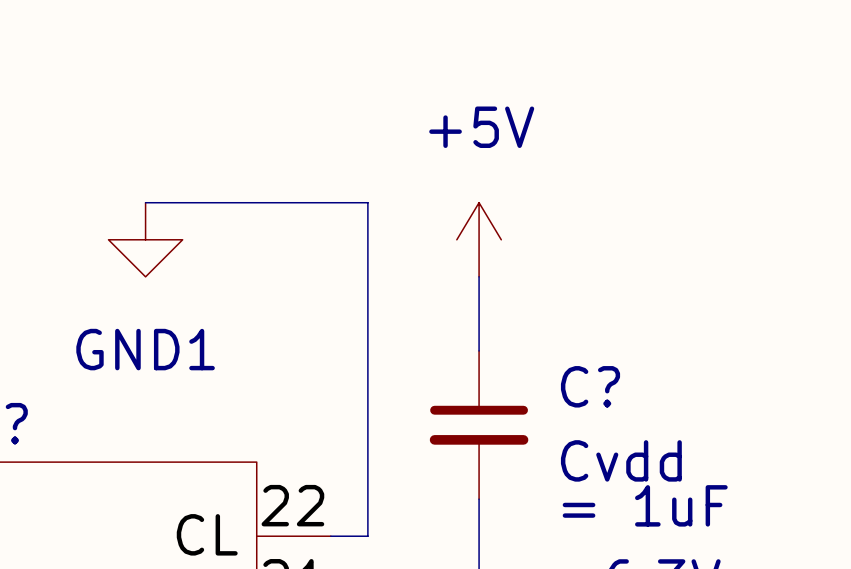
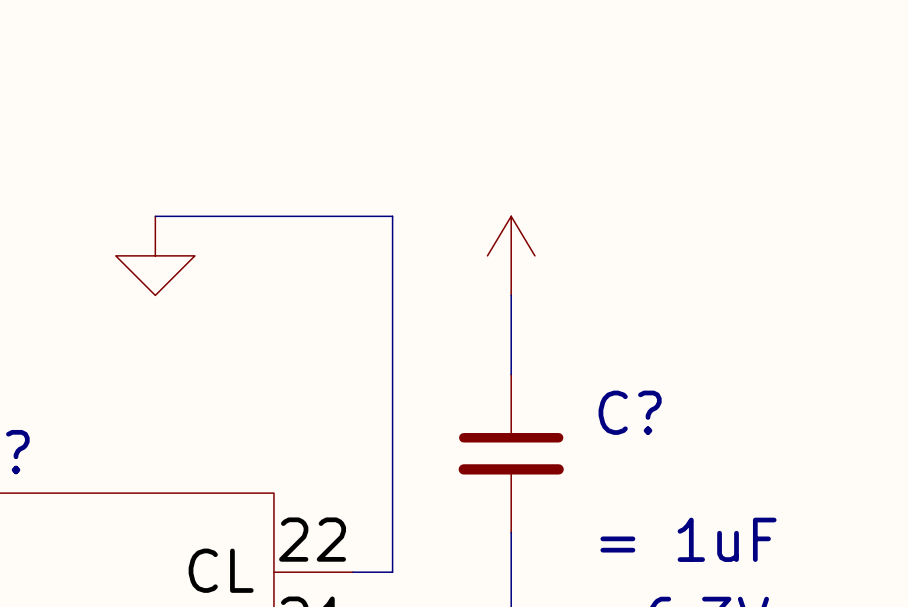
power symbol text: +5V (481, 127) -> none
power symbol text: GND1 (145, 349) -> none
C? value: Cvdd (621, 460) -> none

